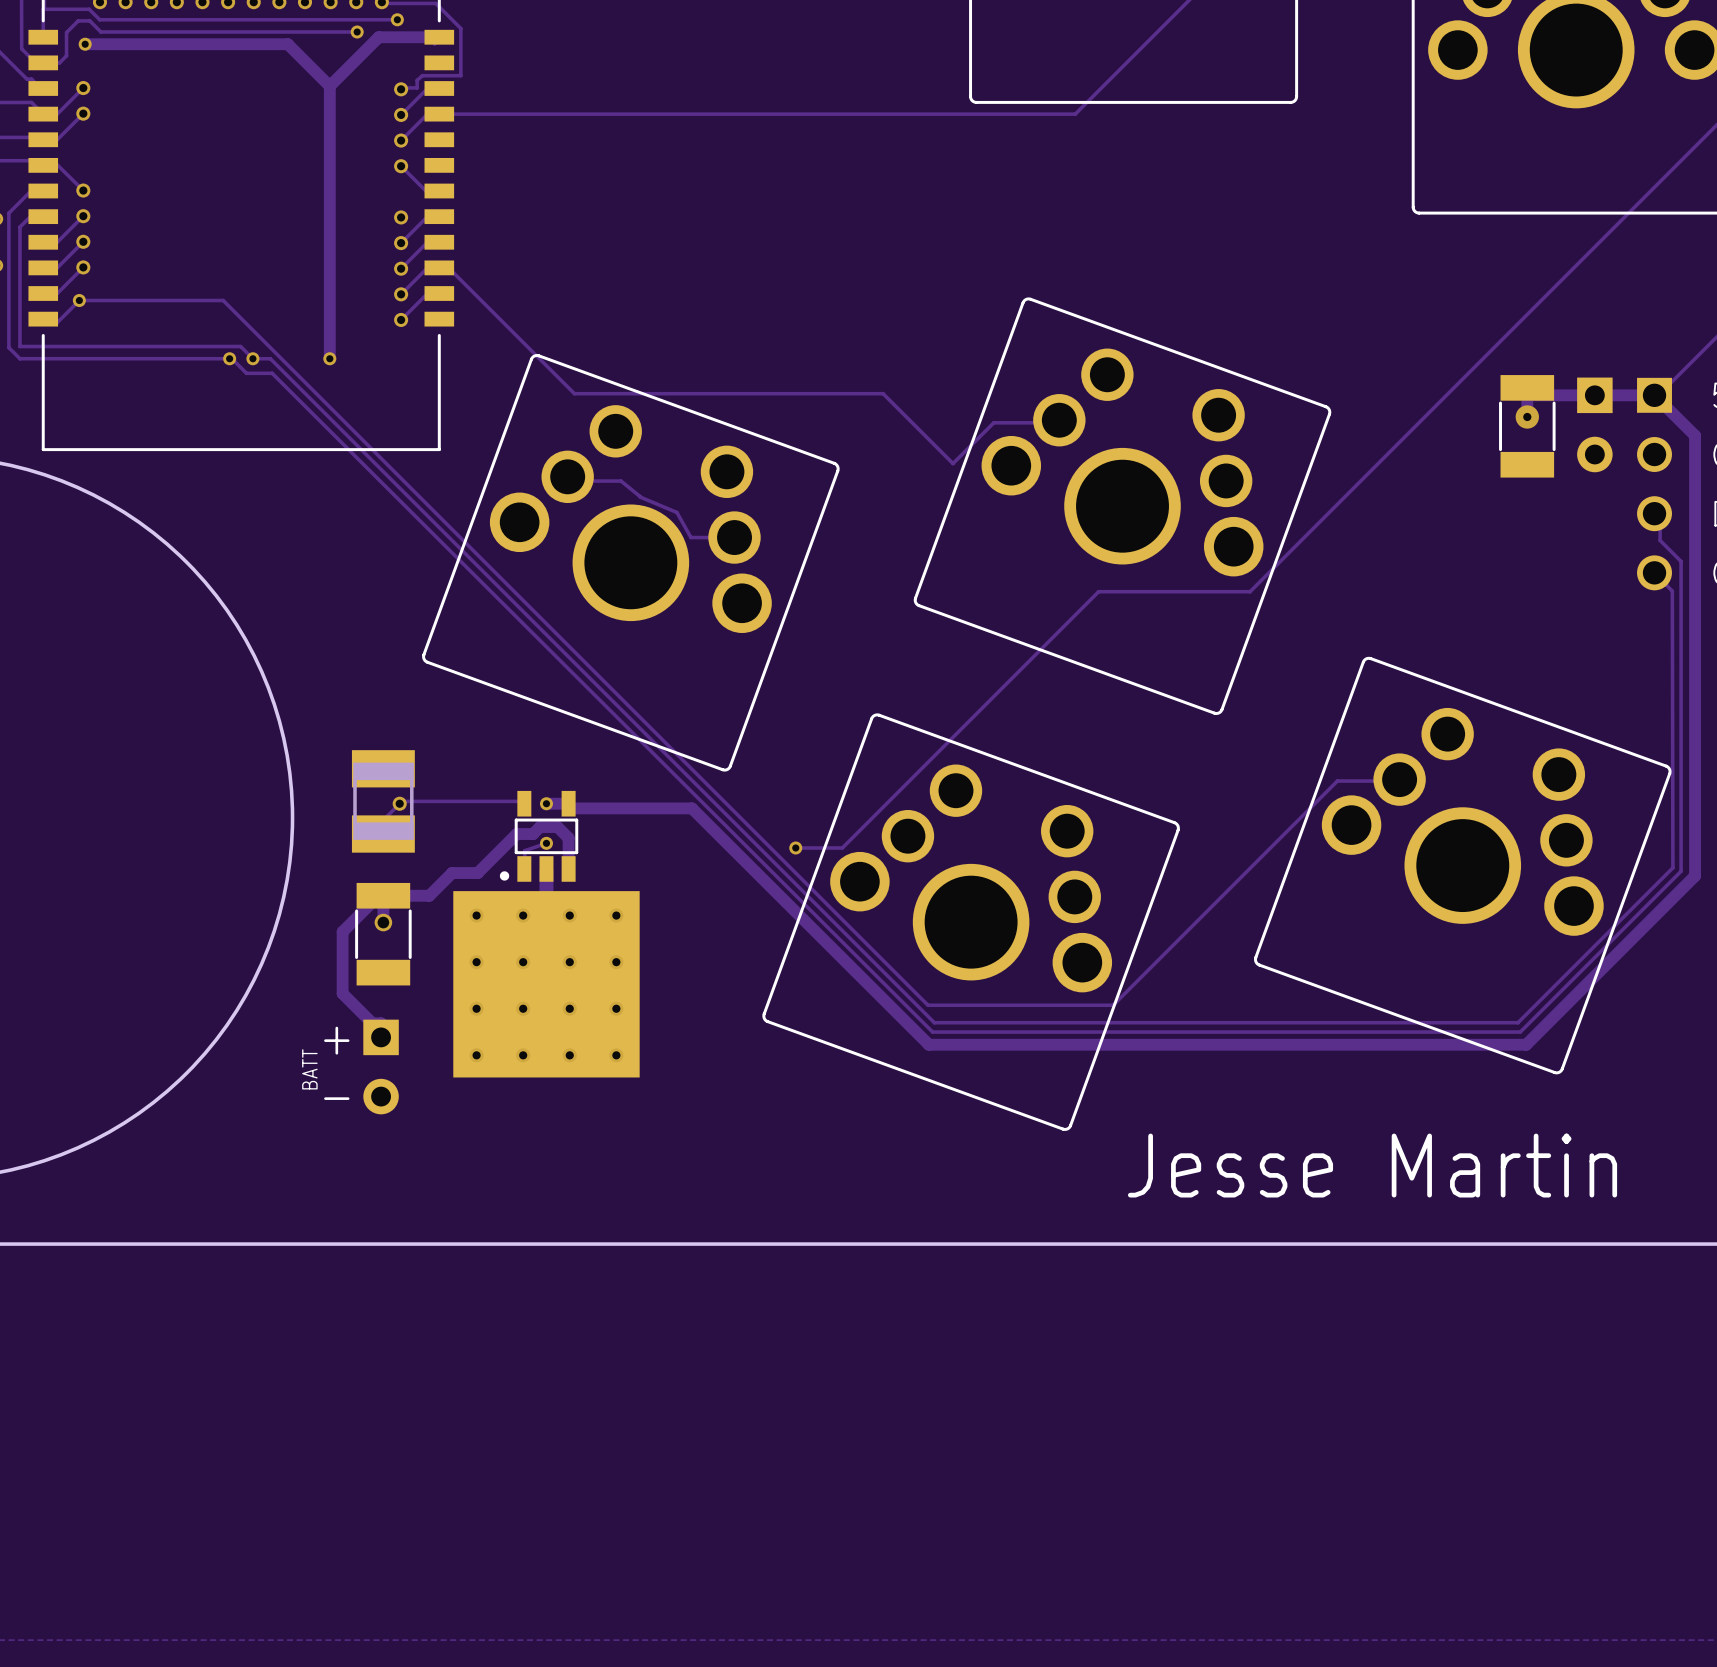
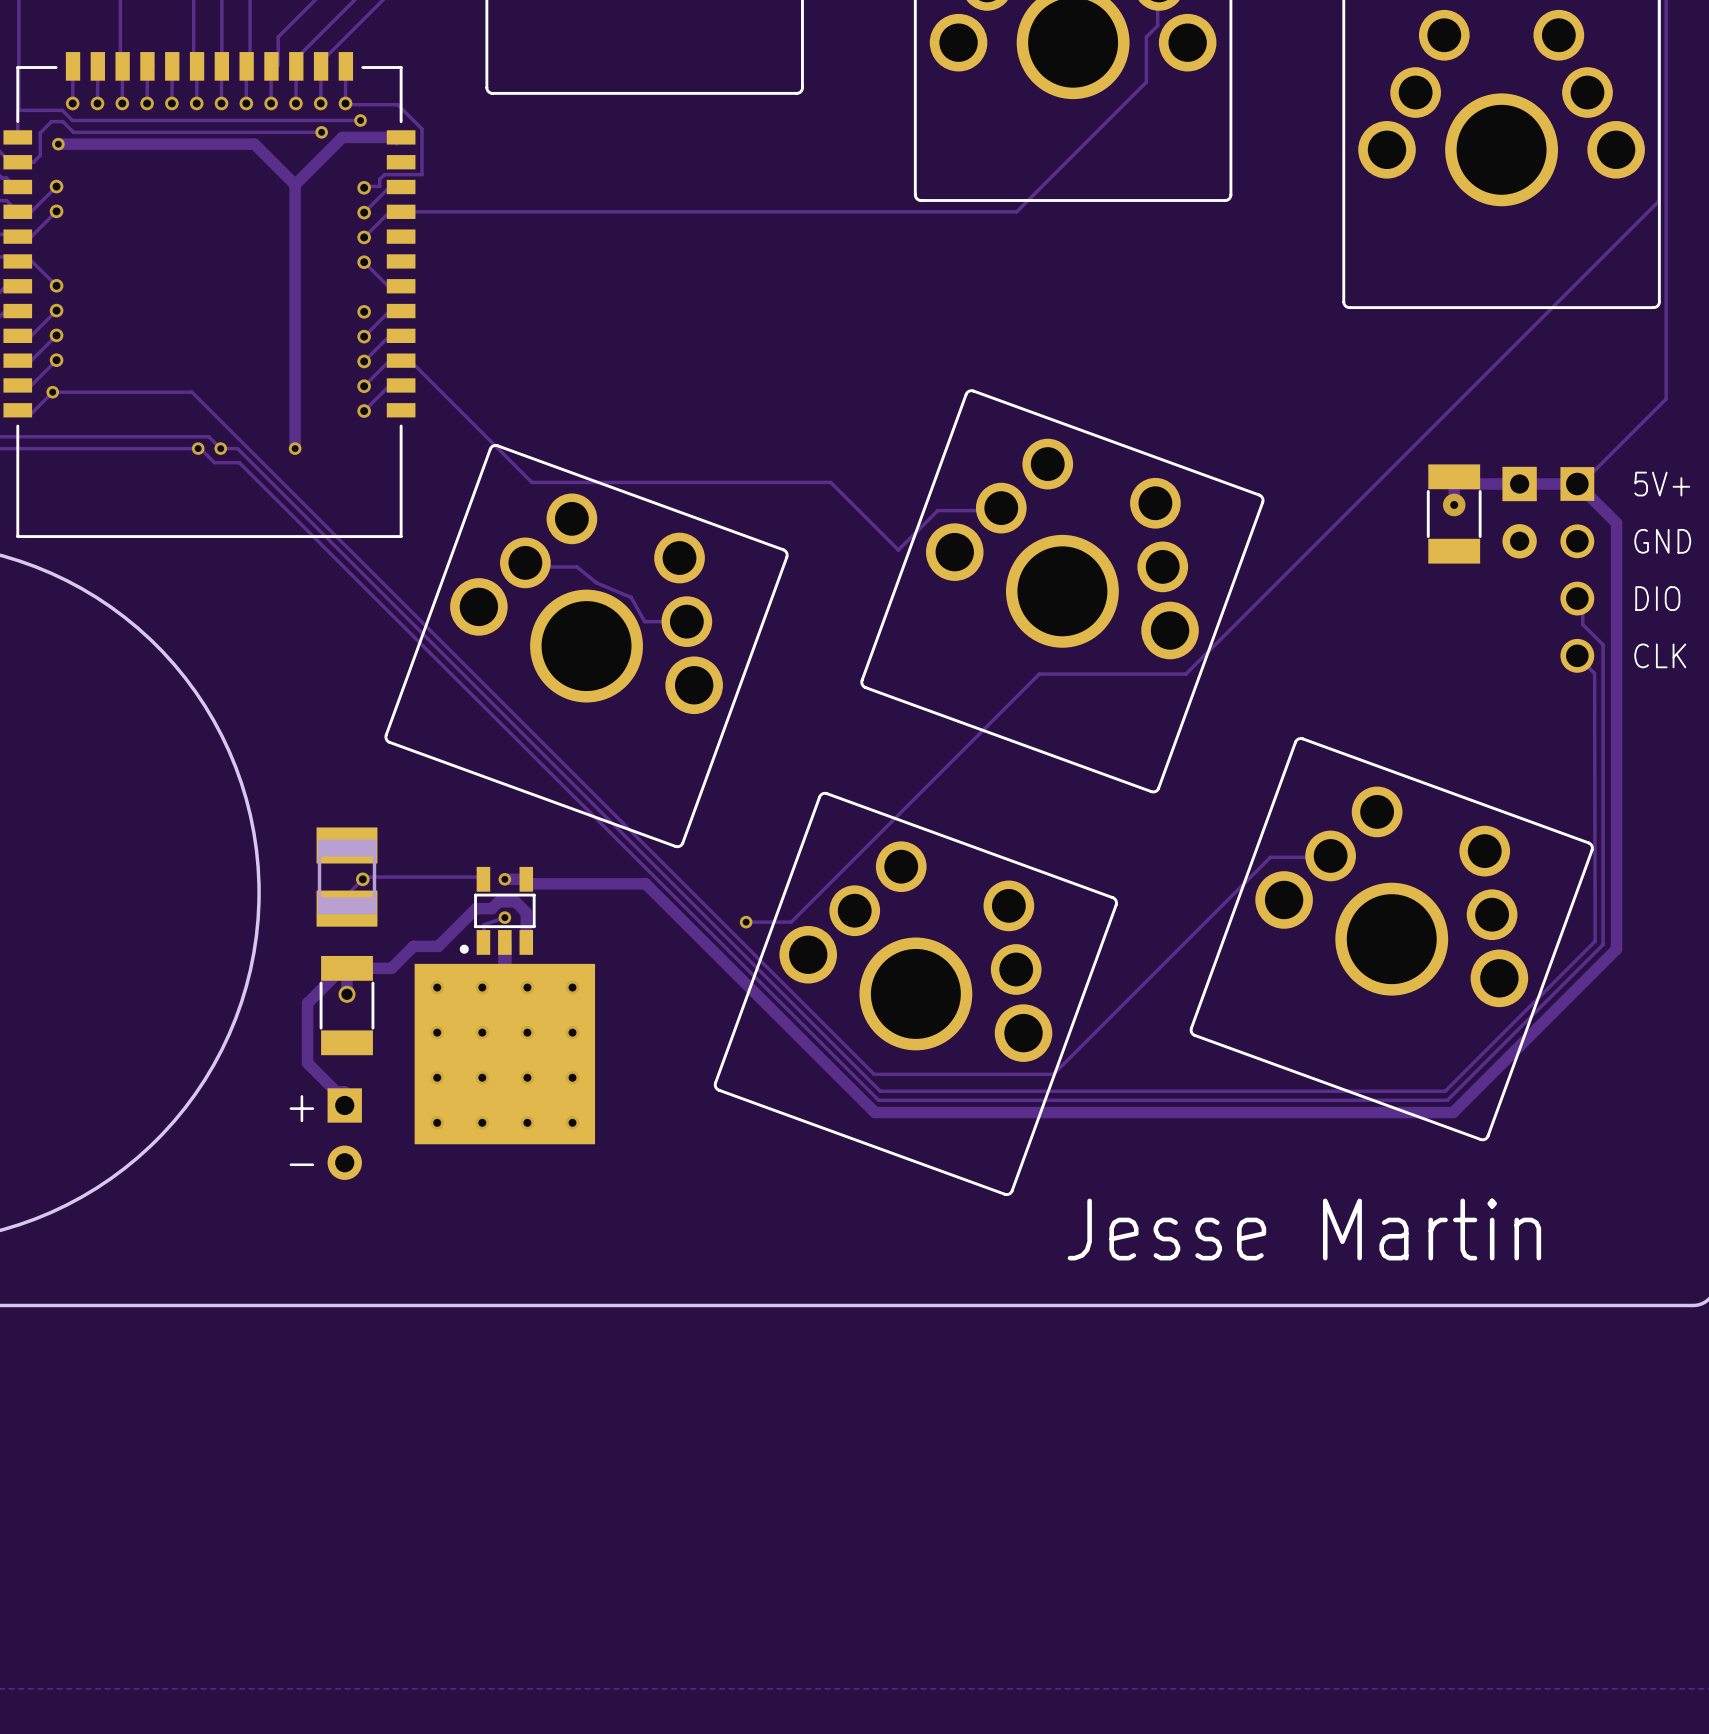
text: BATT (309, 1069) -> none

